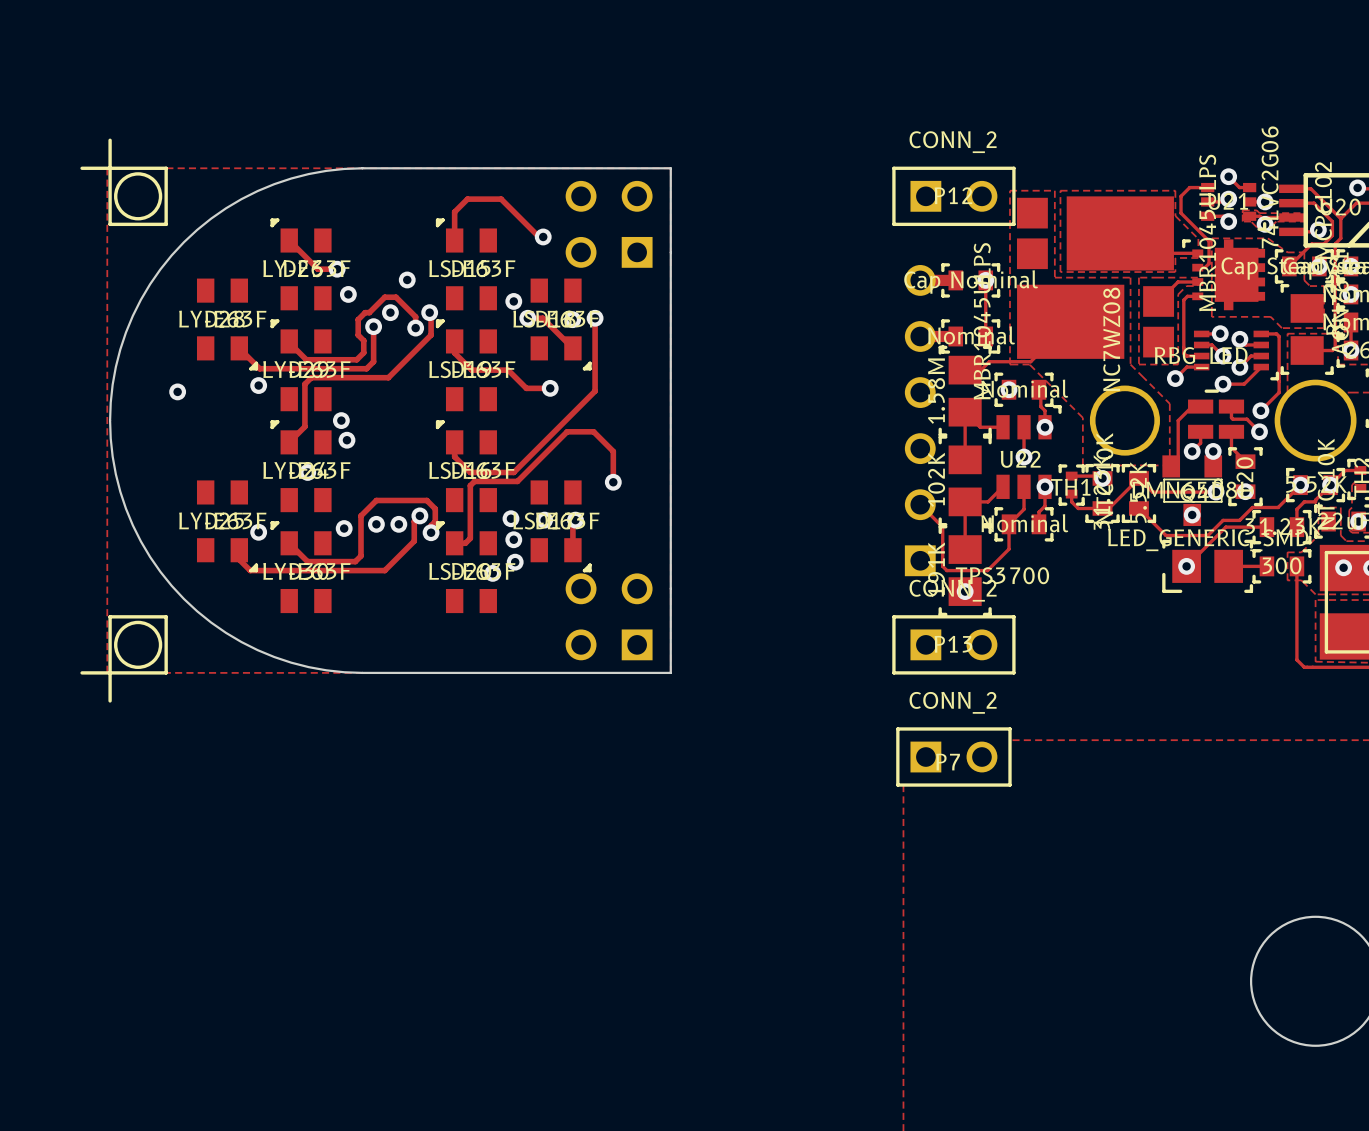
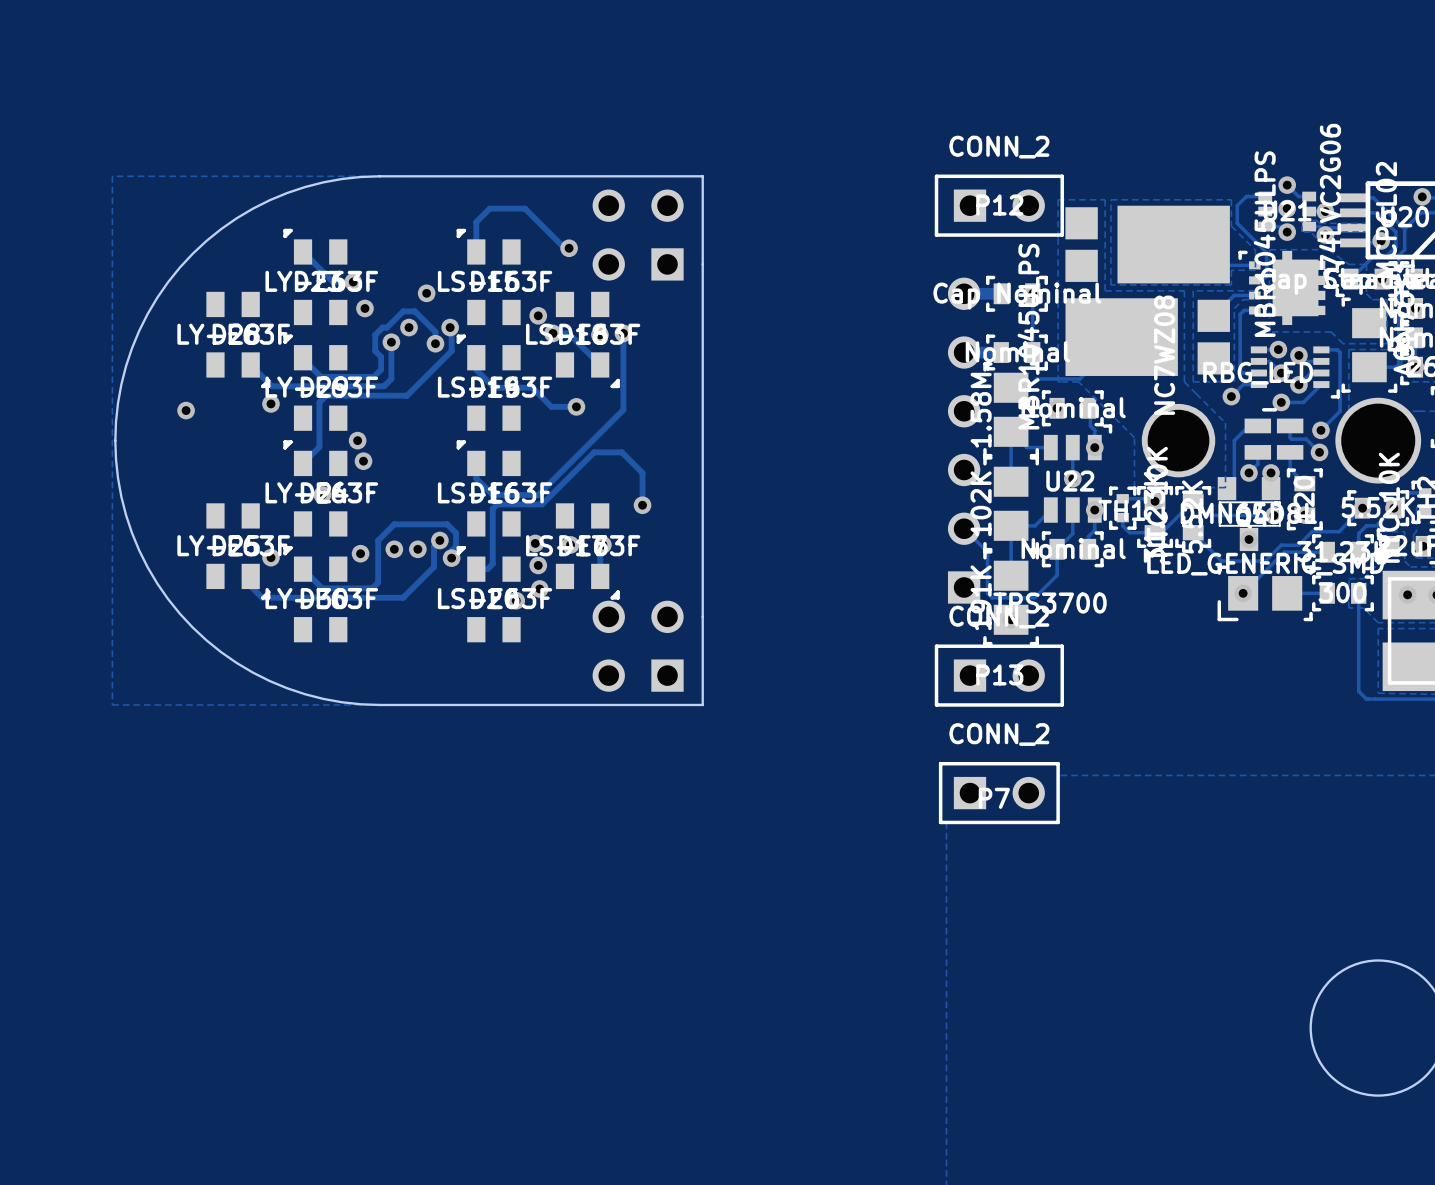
line: (110, 140) (110, 224) (166, 224) (166, 168) (82, 168) -> none
drawing: [114, 172, 163, 221] -> none
drawing: [114, 620, 163, 669] -> none
line: (82, 672) (166, 672) (166, 616) (110, 616) (110, 700) -> none

